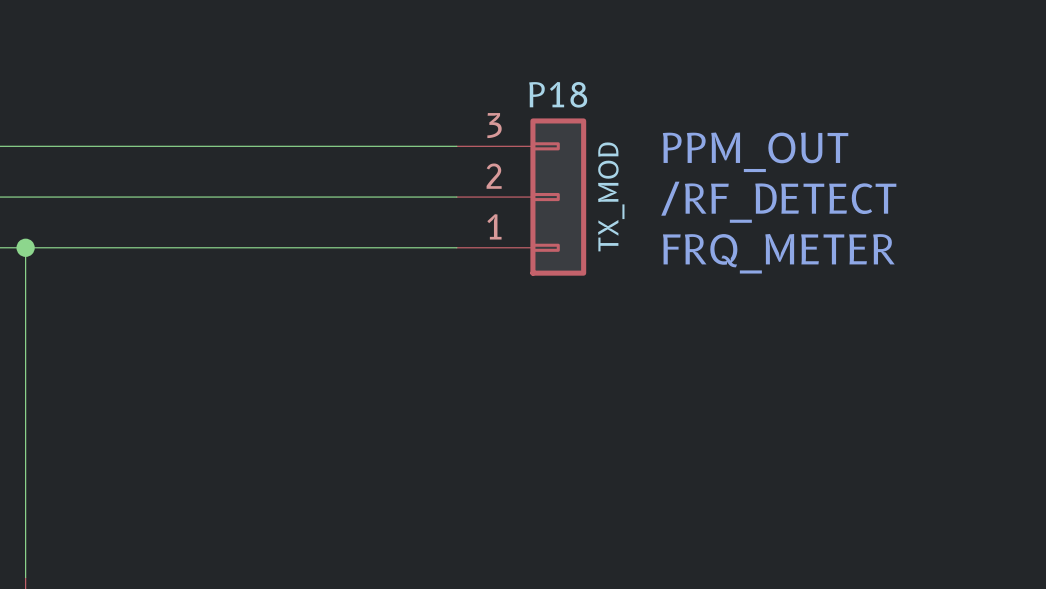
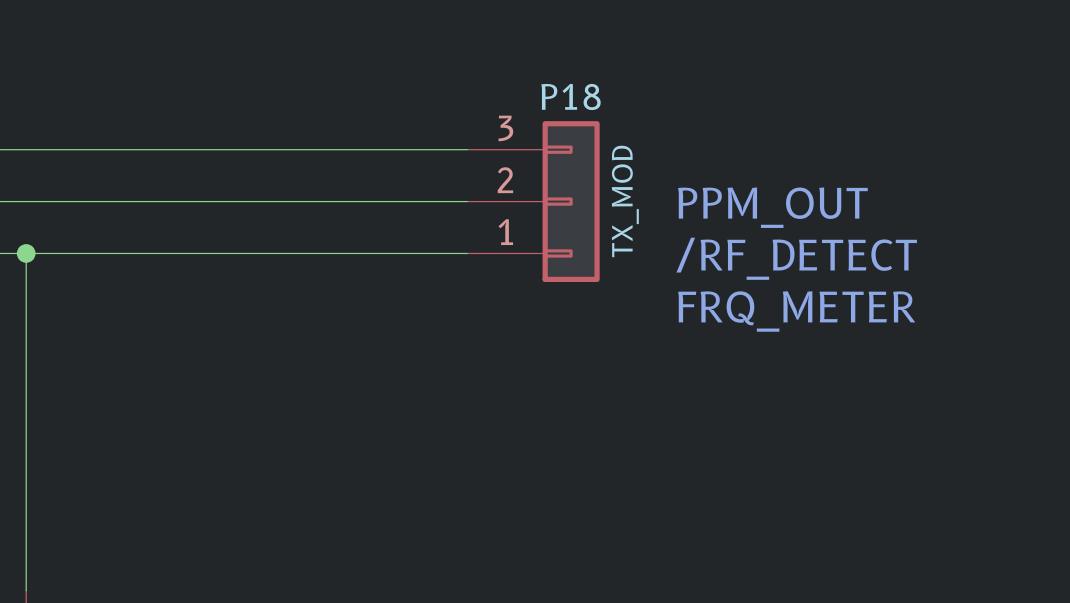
text: PPM_OUT (755, 152) -> none
text: /RF_DETECT (778, 202) -> PPM_OUT (772, 207)
text: FRQ_METER (778, 253) -> /RF_DETECT (796, 258)
text: none -> FRQ_METER (796, 311)

